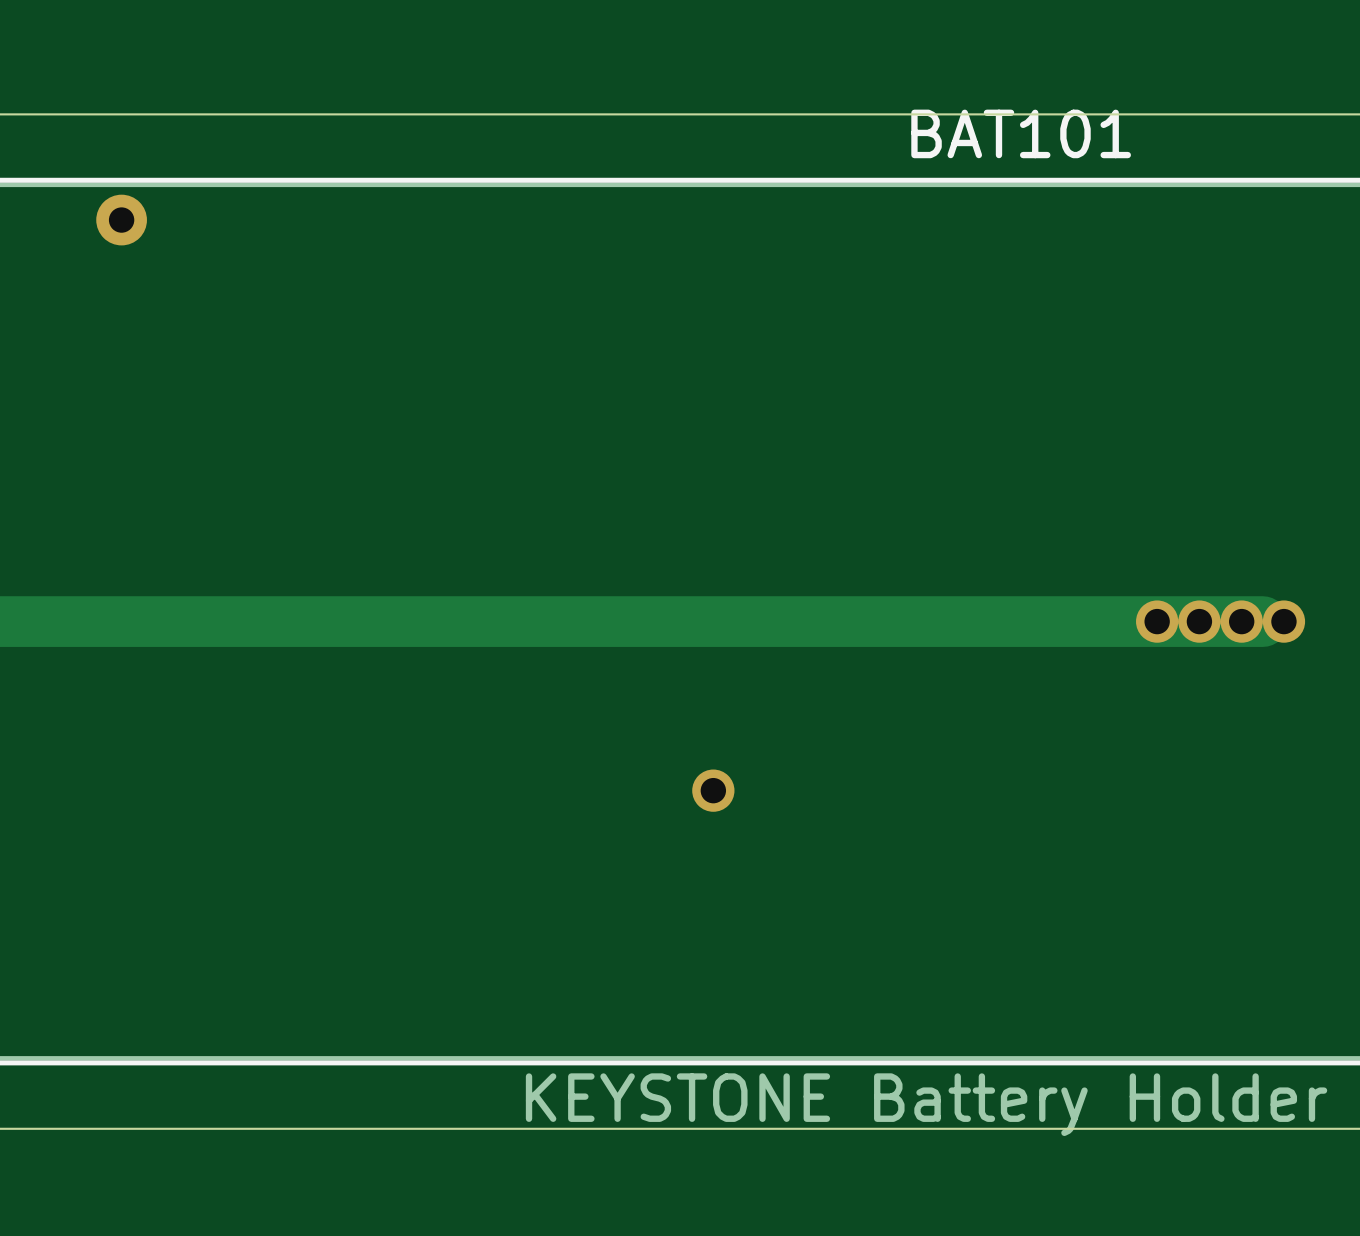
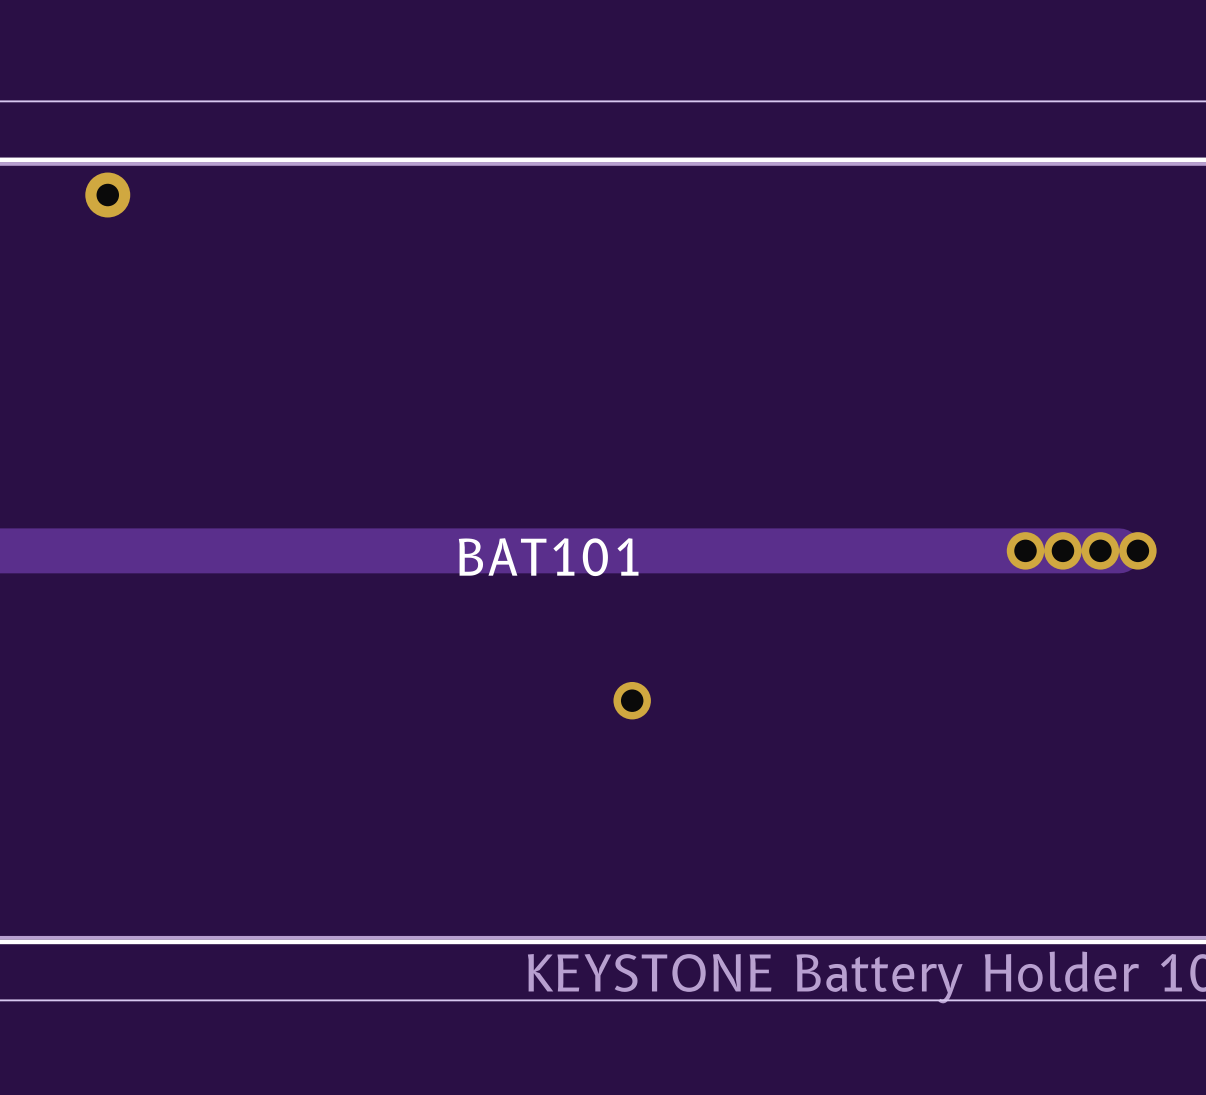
BAT101 name position: BAT101 (1021, 133) -> BAT101 (548, 557)

